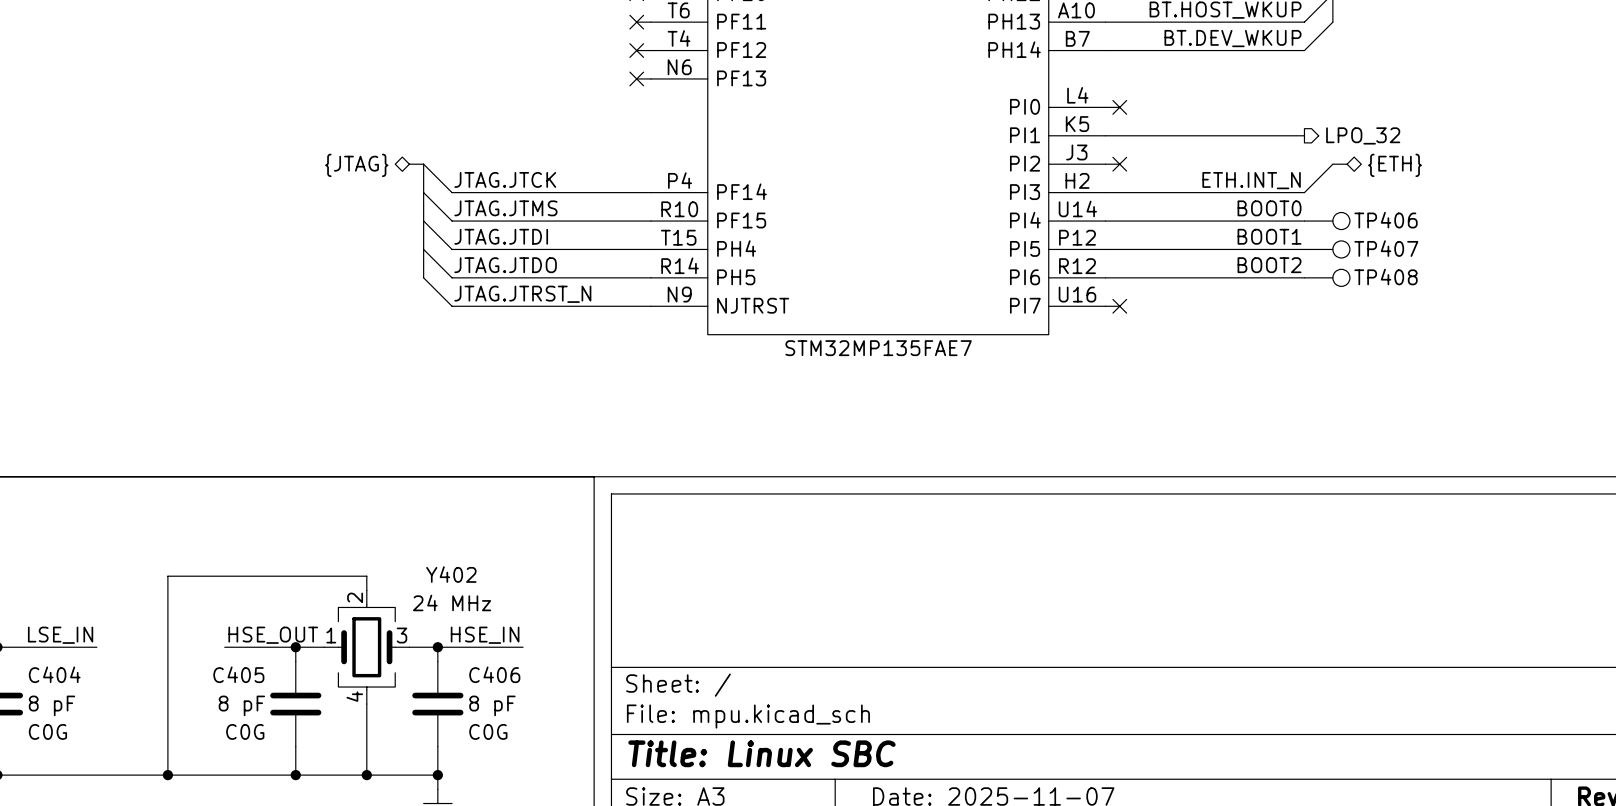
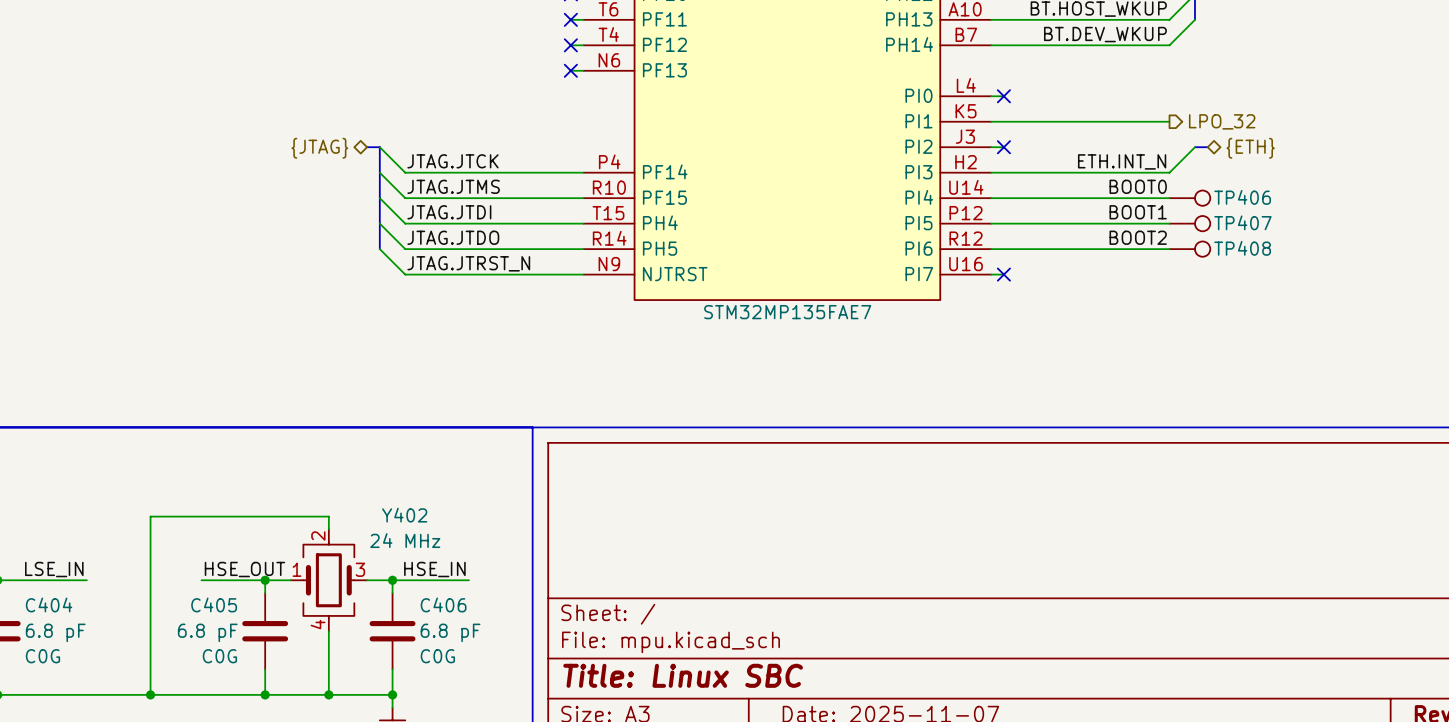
C404 value: 8 pF (52, 705) -> 6.8 pF (55, 632)
C405 value: 8 pF (241, 705) -> 6.8 pF (207, 632)
C406 value: 8 pF (492, 705) -> 6.8 pF (450, 632)

